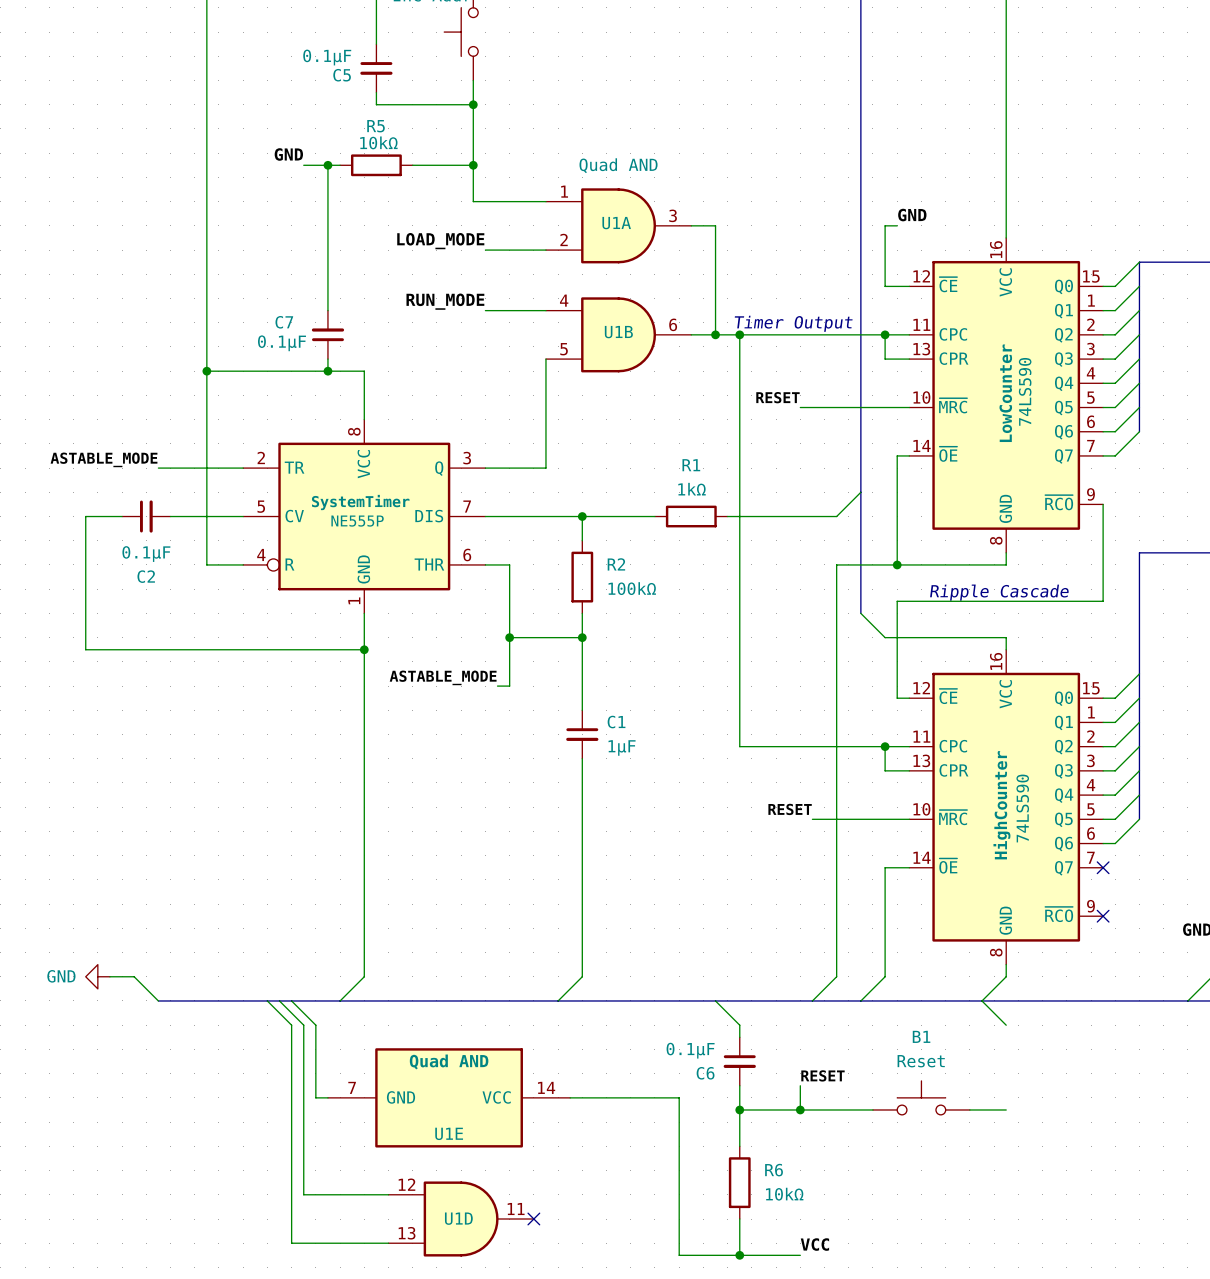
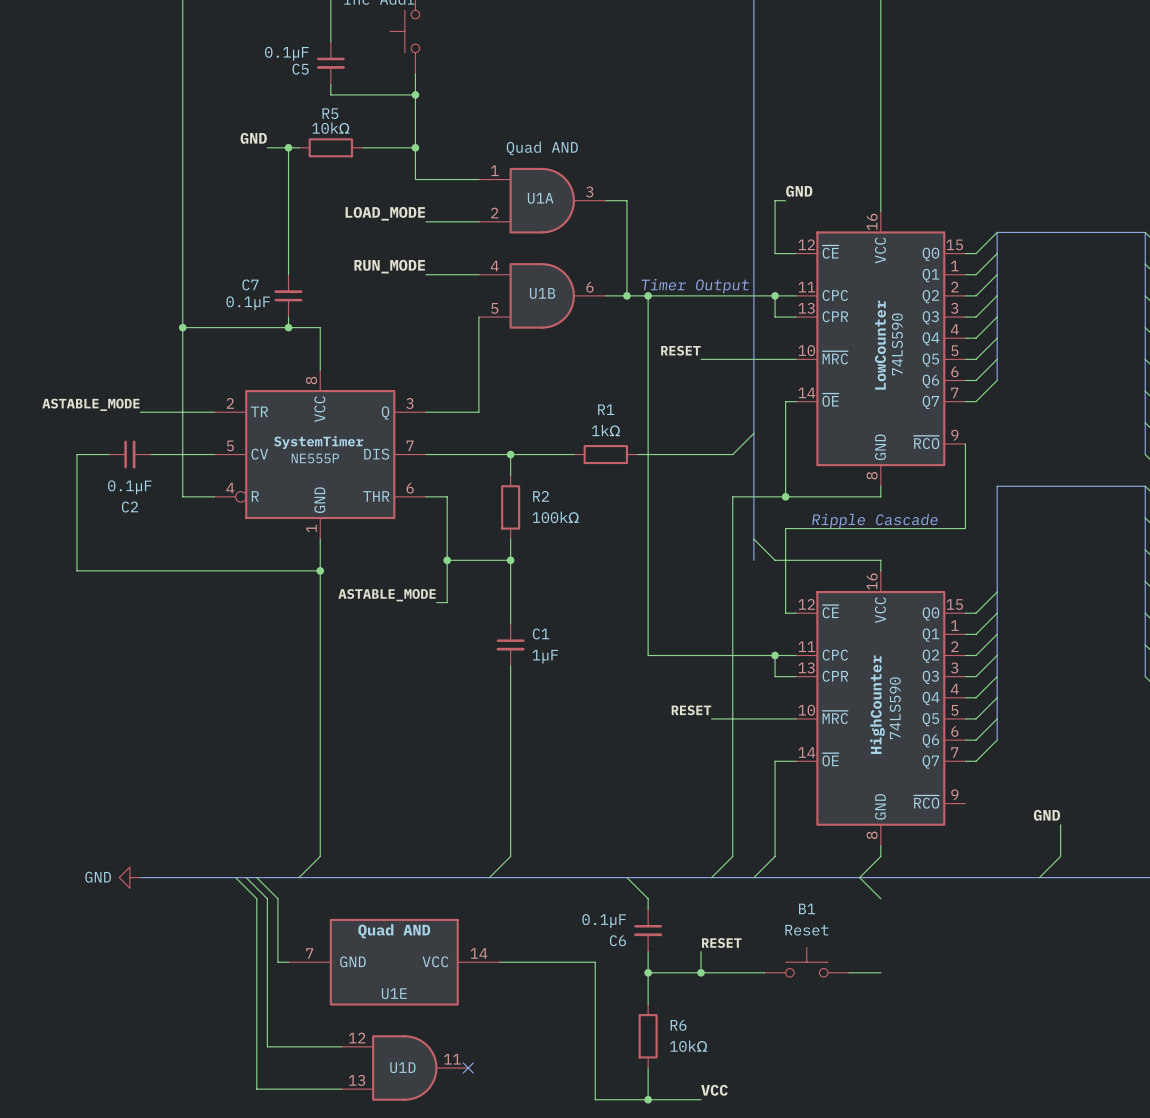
bus: none -> (753, 539) (753, 560)
bus: none -> (997, 718) (997, 740)
wire: none -> (997, 740) (976, 761) (965, 761)
no-connect mark: (1103, 867) -> none
no-connect mark: (1103, 916) -> none
power symbol position: GND (97, 976) -> GND (129, 877)
wire: (109, 976) (134, 976) (158, 1000) -> none

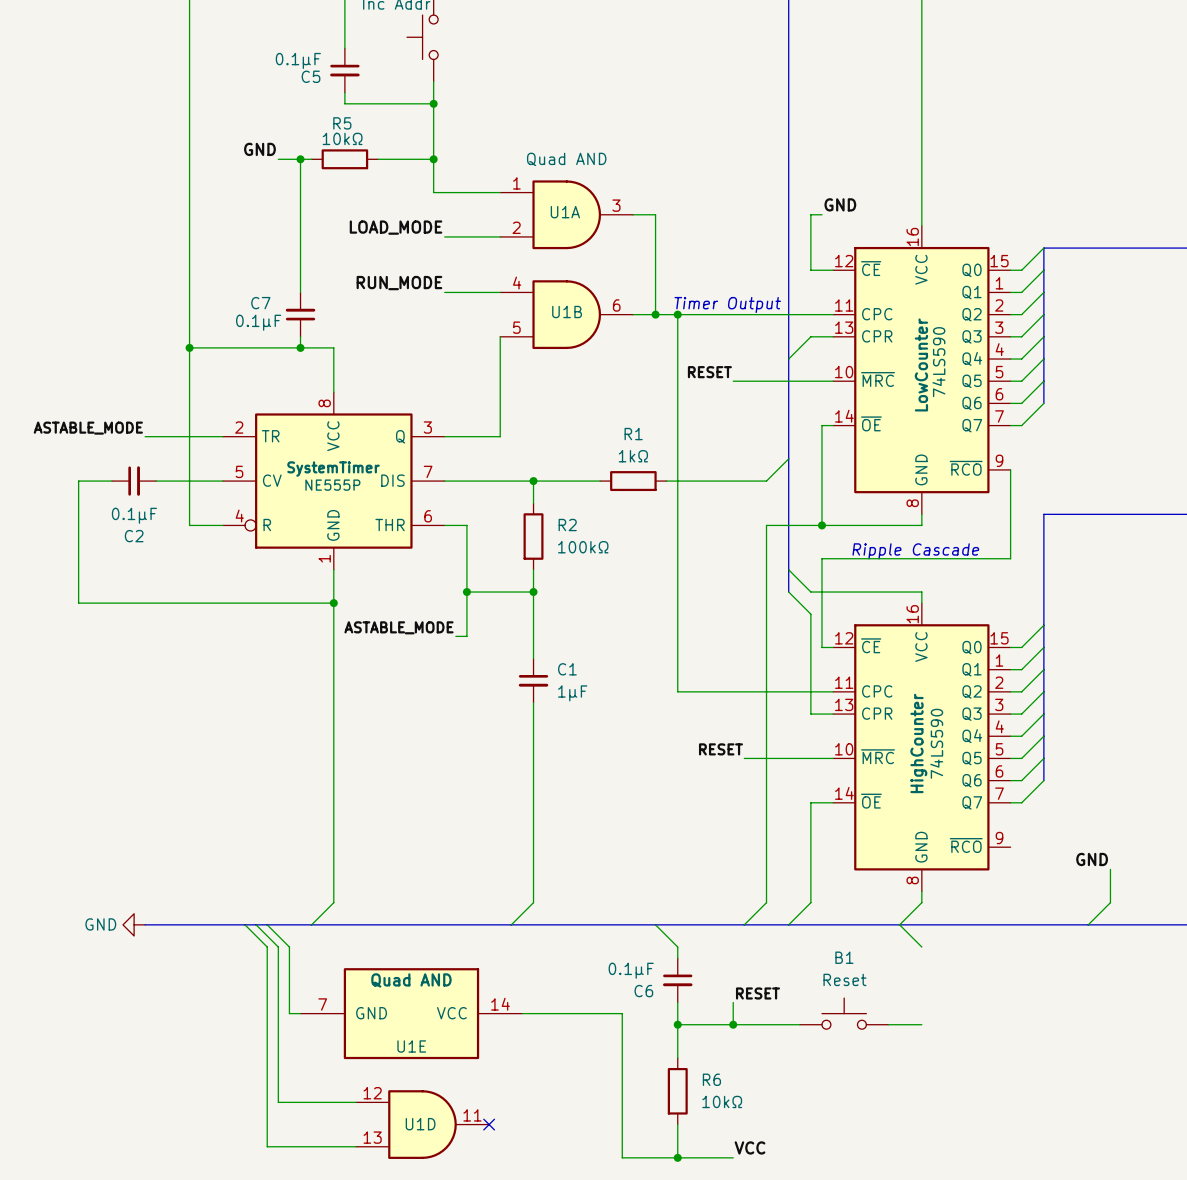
wire: (775, 295) (775, 317) -> (788, 359) (810, 336)
junction: (775, 295) -> none
wire: none -> (788, 592) (810, 614) (810, 691)
junction: (775, 655) -> none

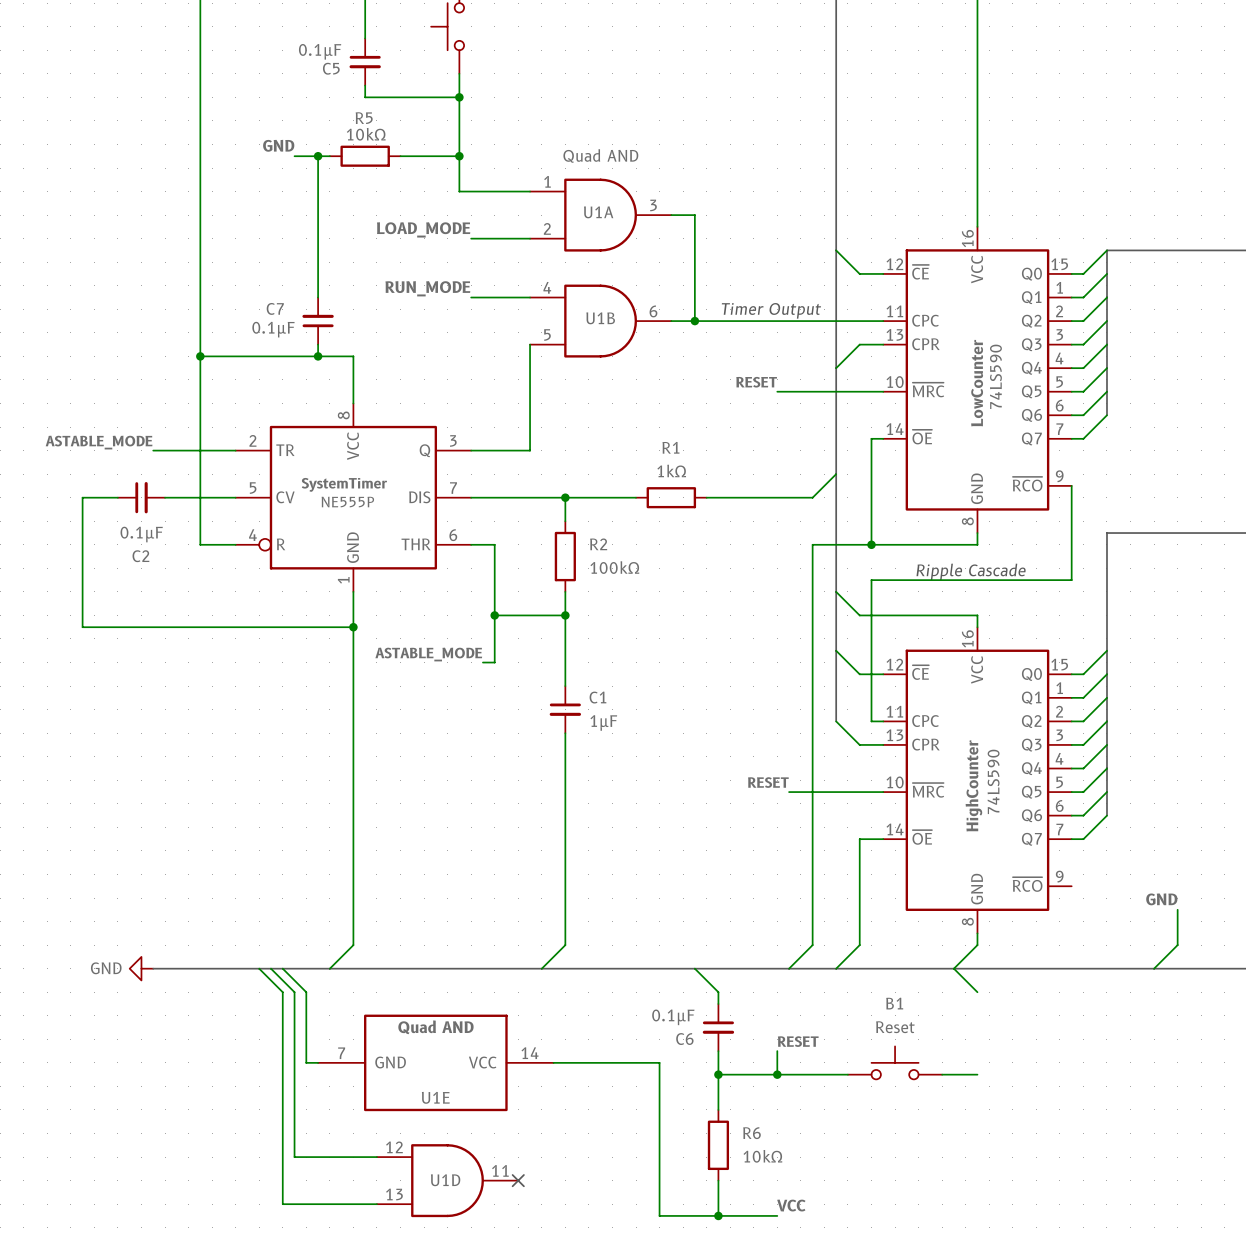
label: GND (840, 204) -> none
wire: (821, 214) (810, 214) (810, 270) -> (836, 250) (859, 273)
wire: (677, 314) (677, 691) (821, 691) -> (836, 650) (859, 674) (871, 674) (871, 721)
junction: (677, 314) -> none
wire: (788, 592) (810, 614) (810, 714) -> (836, 721) (859, 744)
bus: none -> (836, 615) (836, 721)

